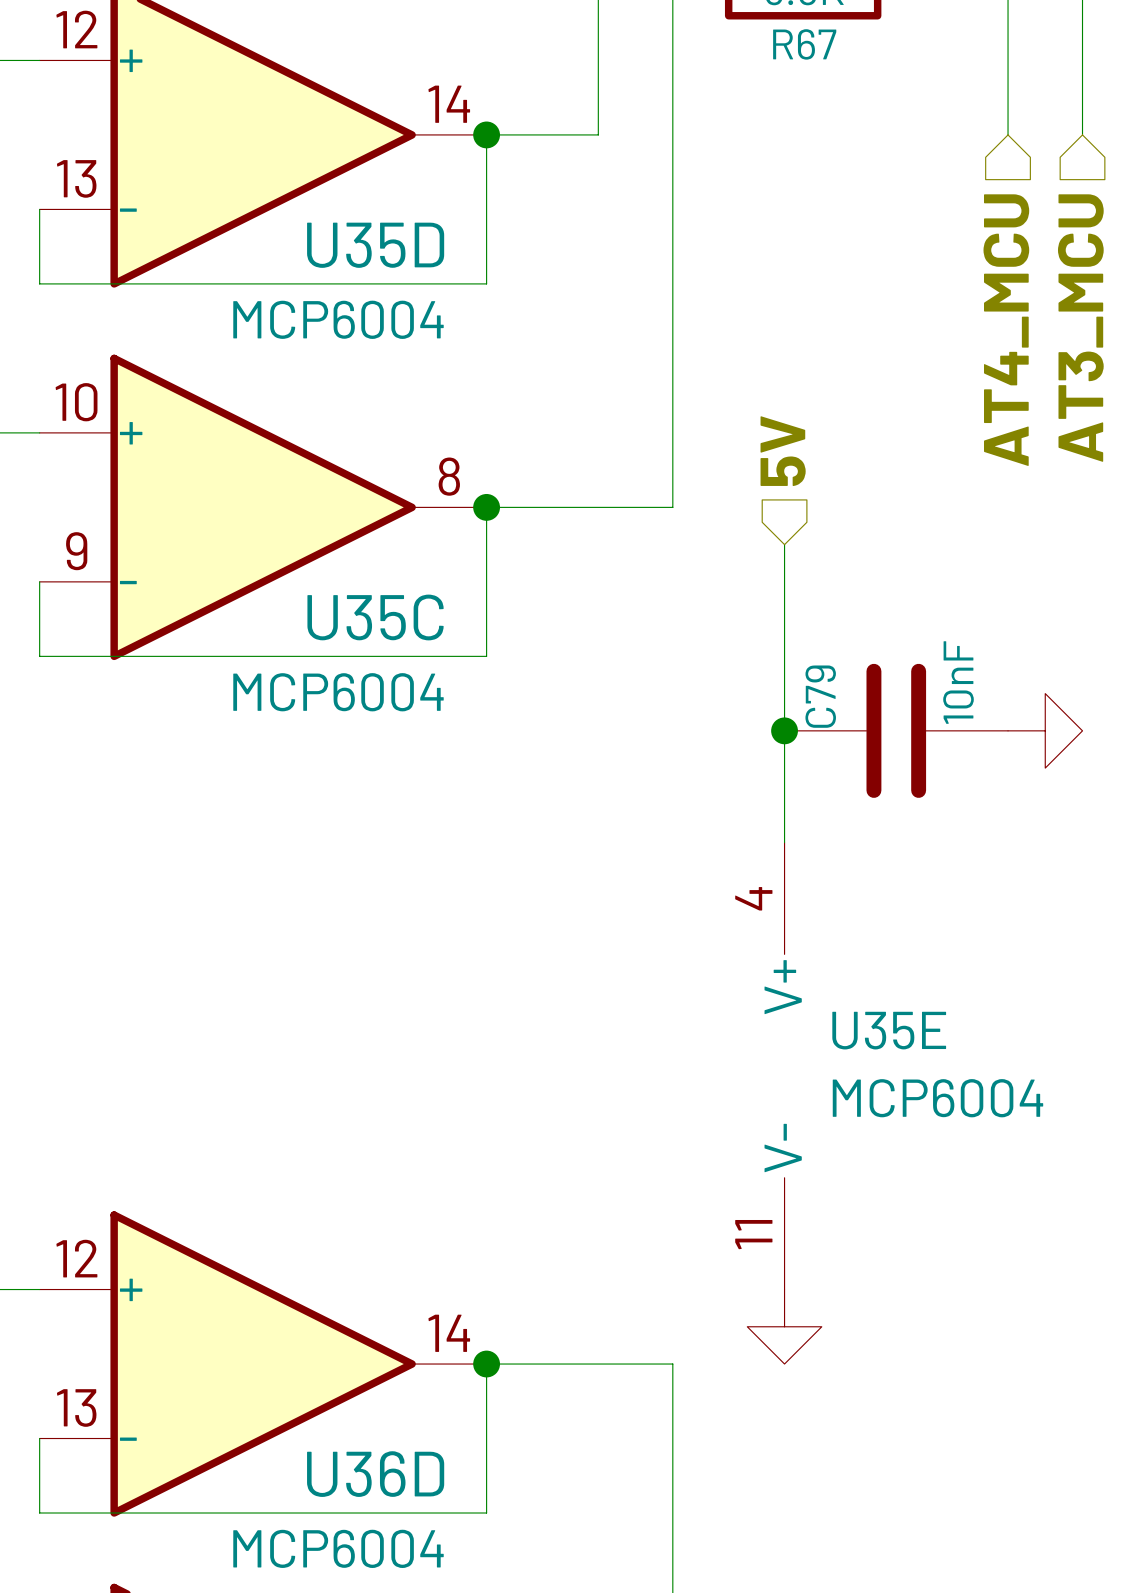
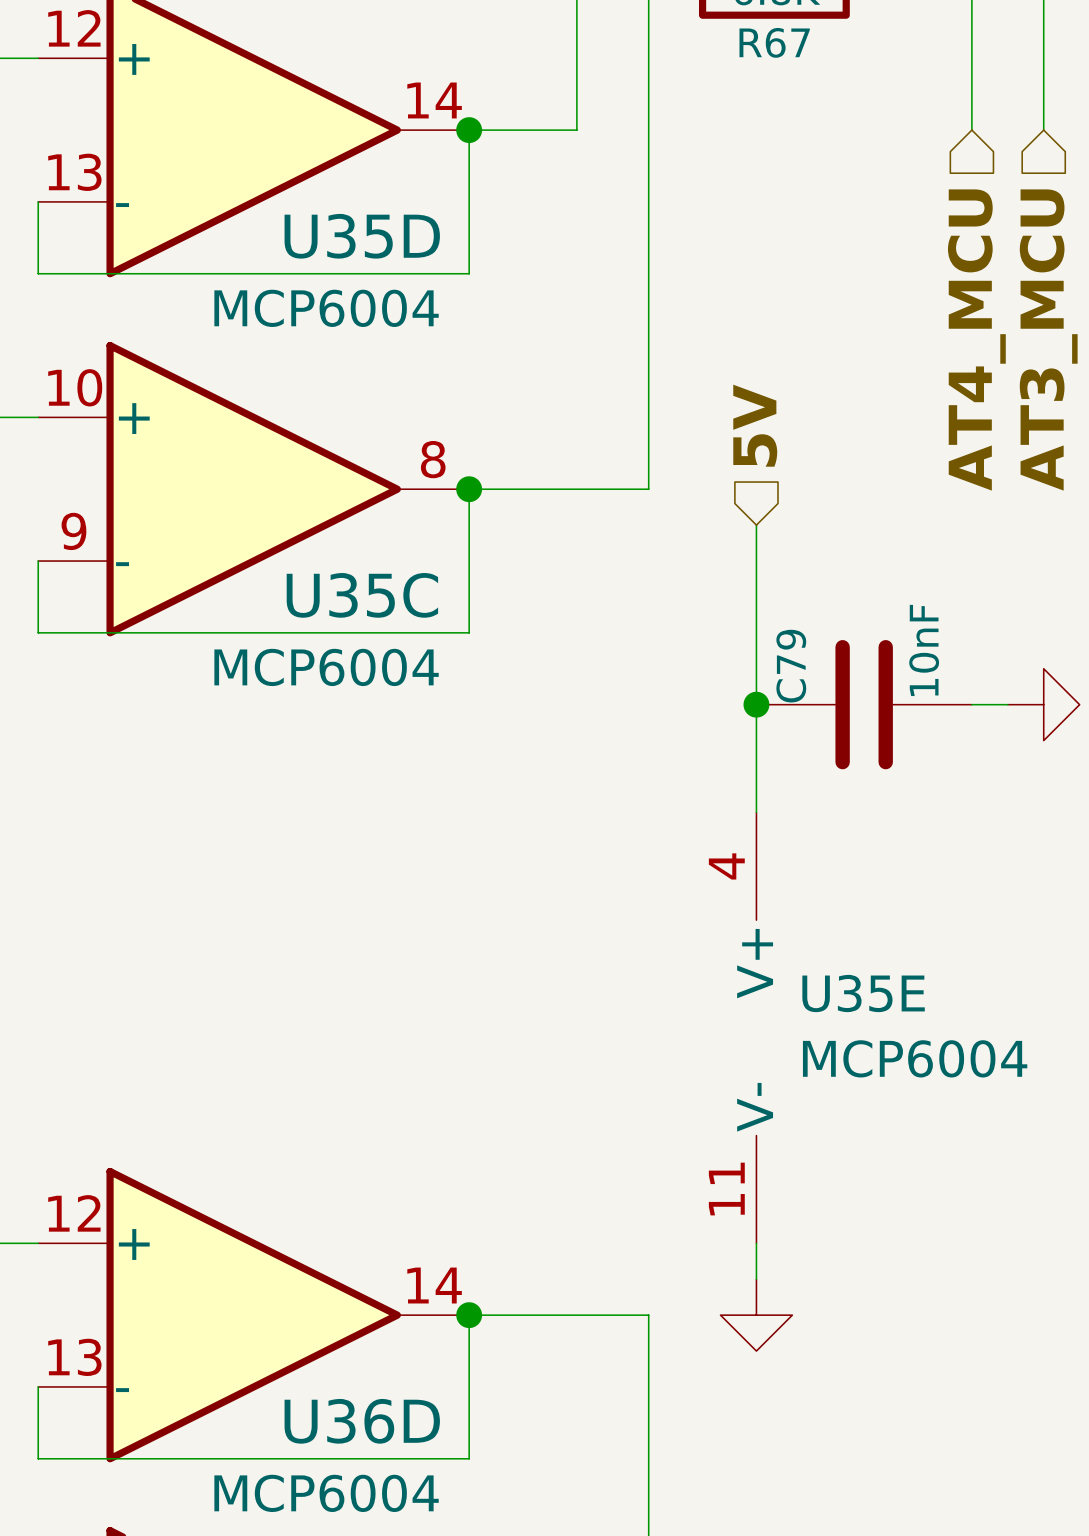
power symbol position: (1045, 730) -> (1043, 704)
power symbol position: (784, 1326) -> (756, 1315)

